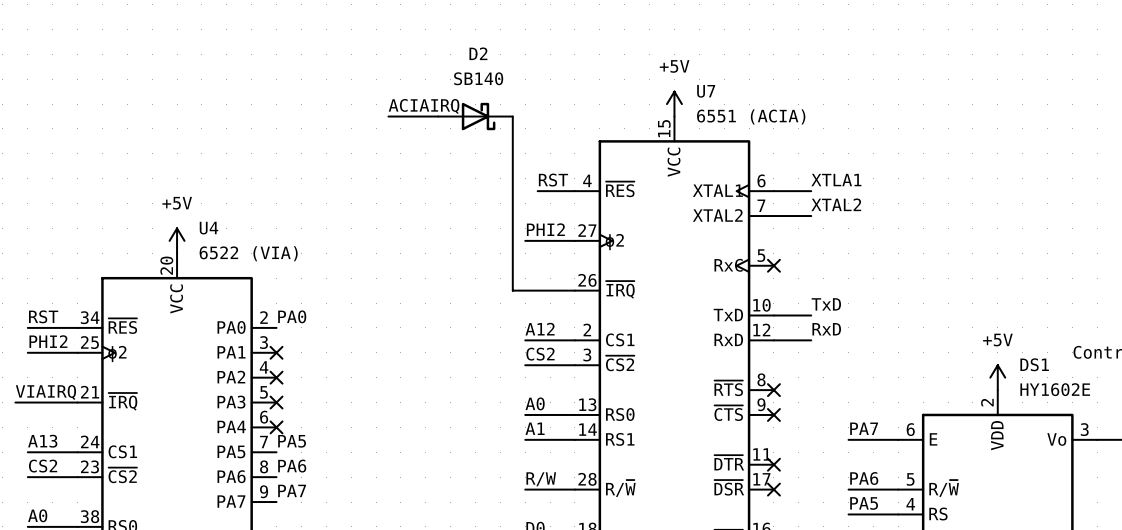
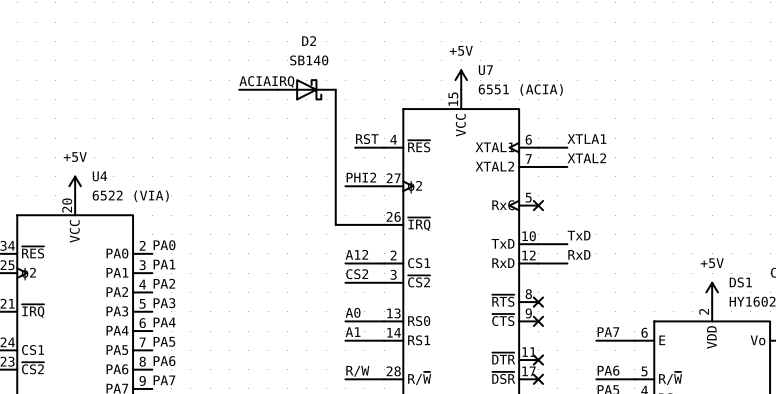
label: none -> PA1 (164, 264)
no-connect mark: (276, 352) -> none
label: none -> PA2 (164, 283)
no-connect mark: (276, 377) -> none
label: none -> PA3 (164, 303)
no-connect mark: (276, 402) -> none
label: none -> PA4 (164, 322)
no-connect mark: (276, 427) -> none

